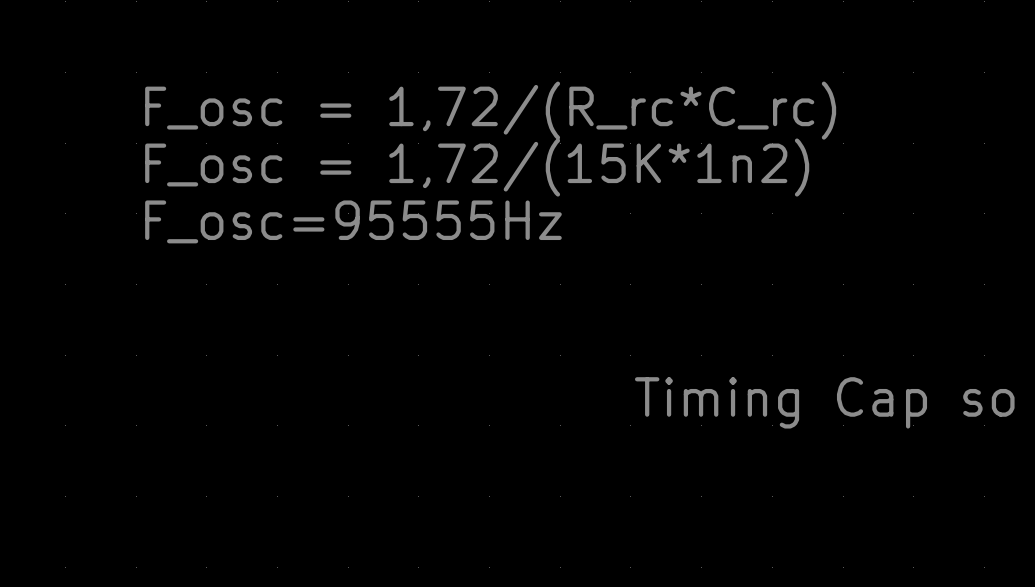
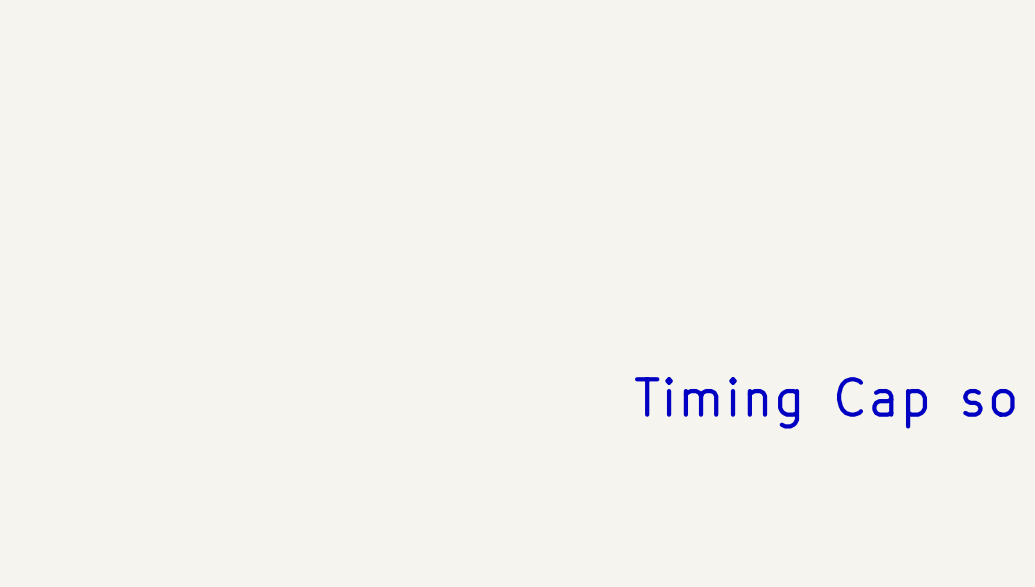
text: F_osc = 1,72/(R_rc*C_rc) (490, 110) -> none
text: F_osc = 1,72/(15K*1n2) (477, 167) -> none
text: F_osc=95555Hz (353, 221) -> none

